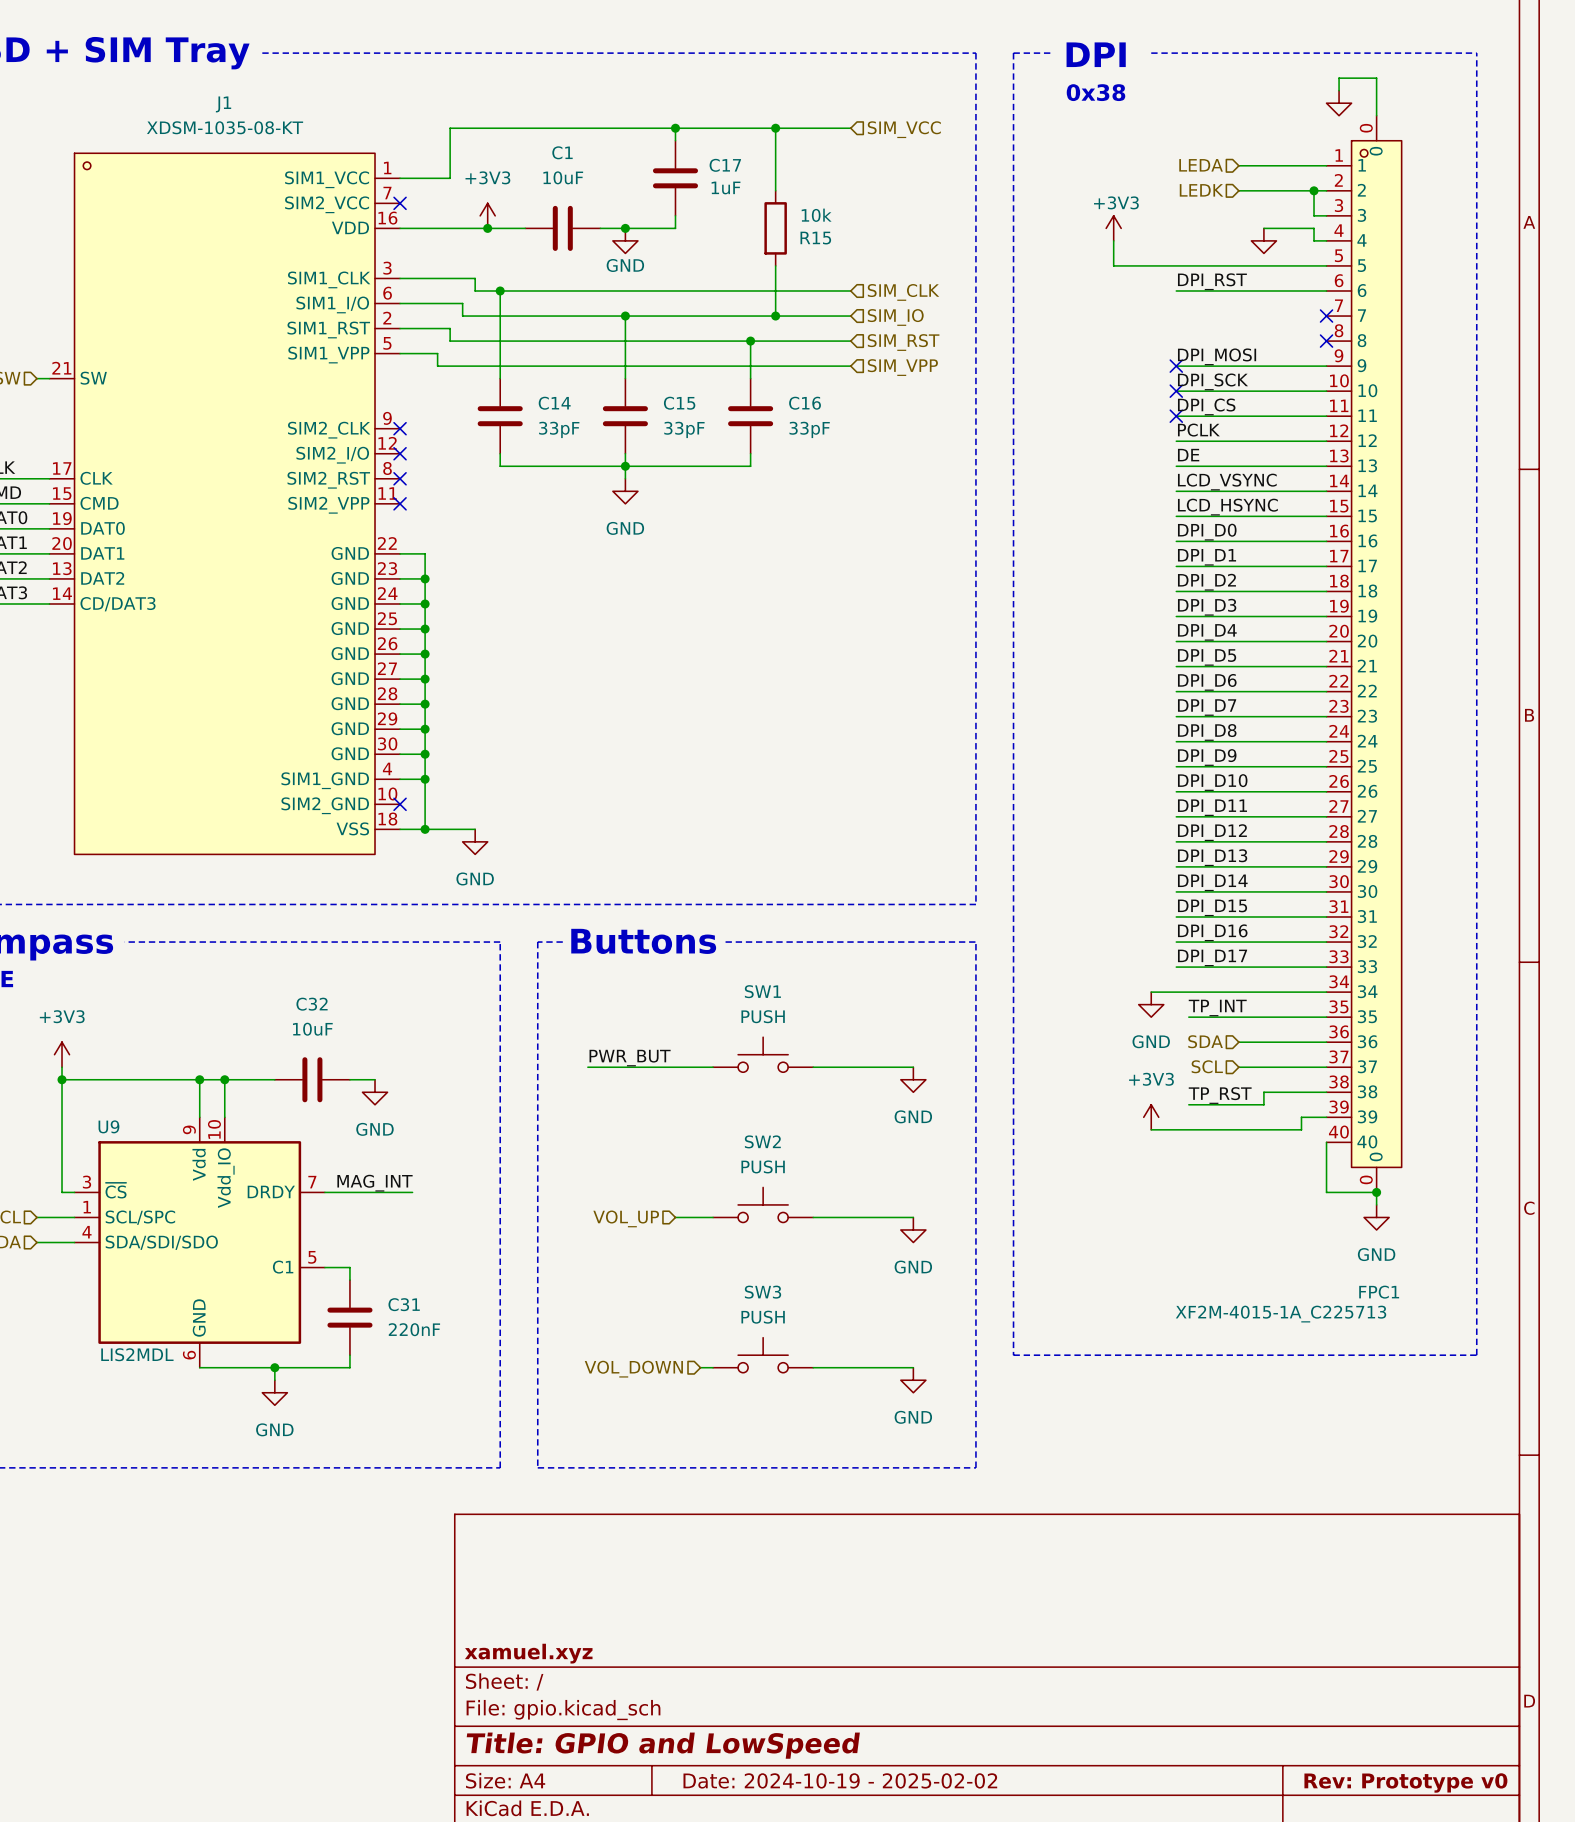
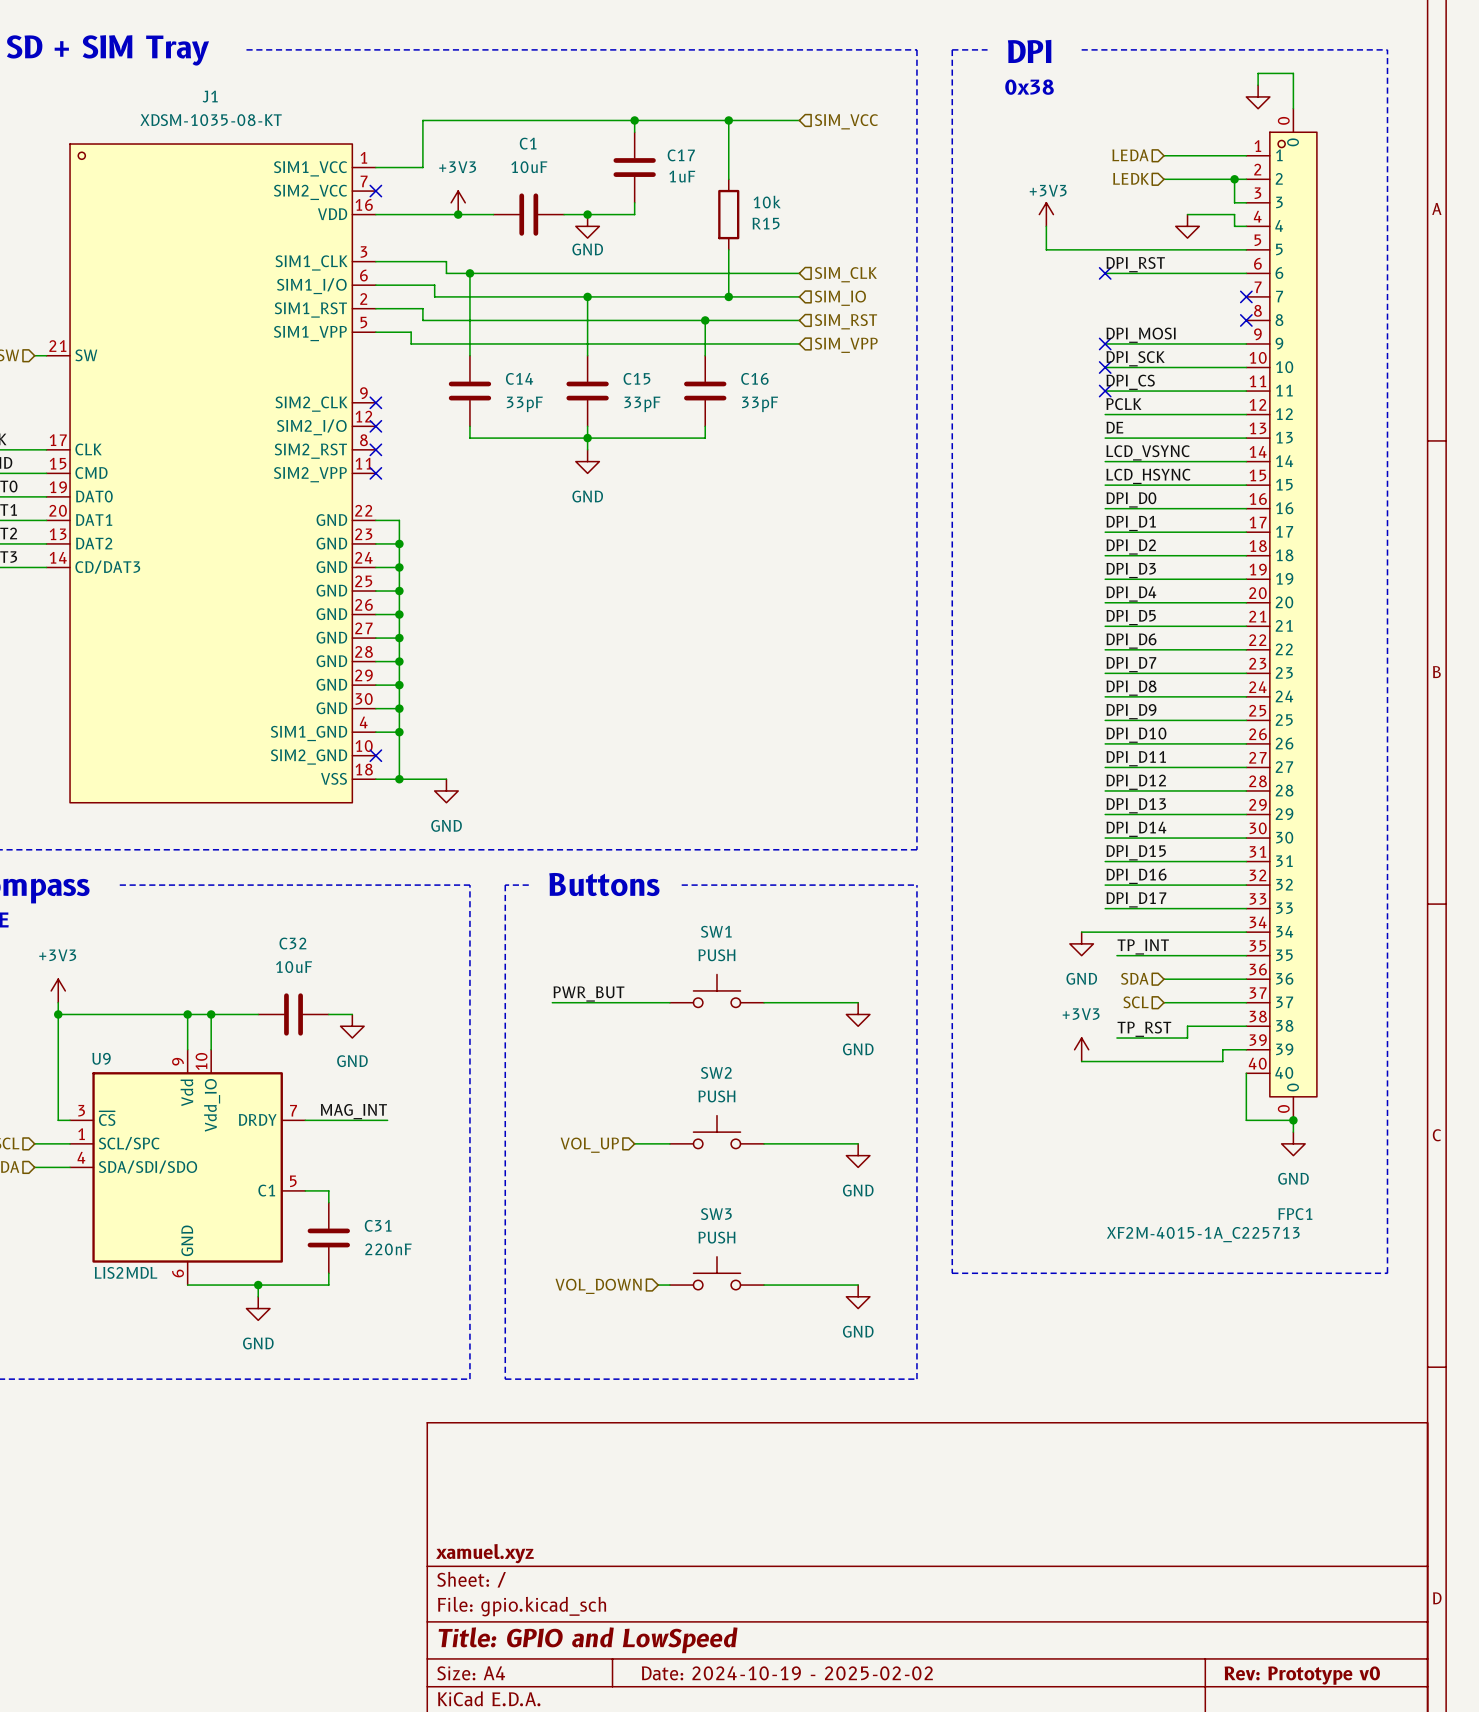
no-connect mark: none -> (1105, 273)

